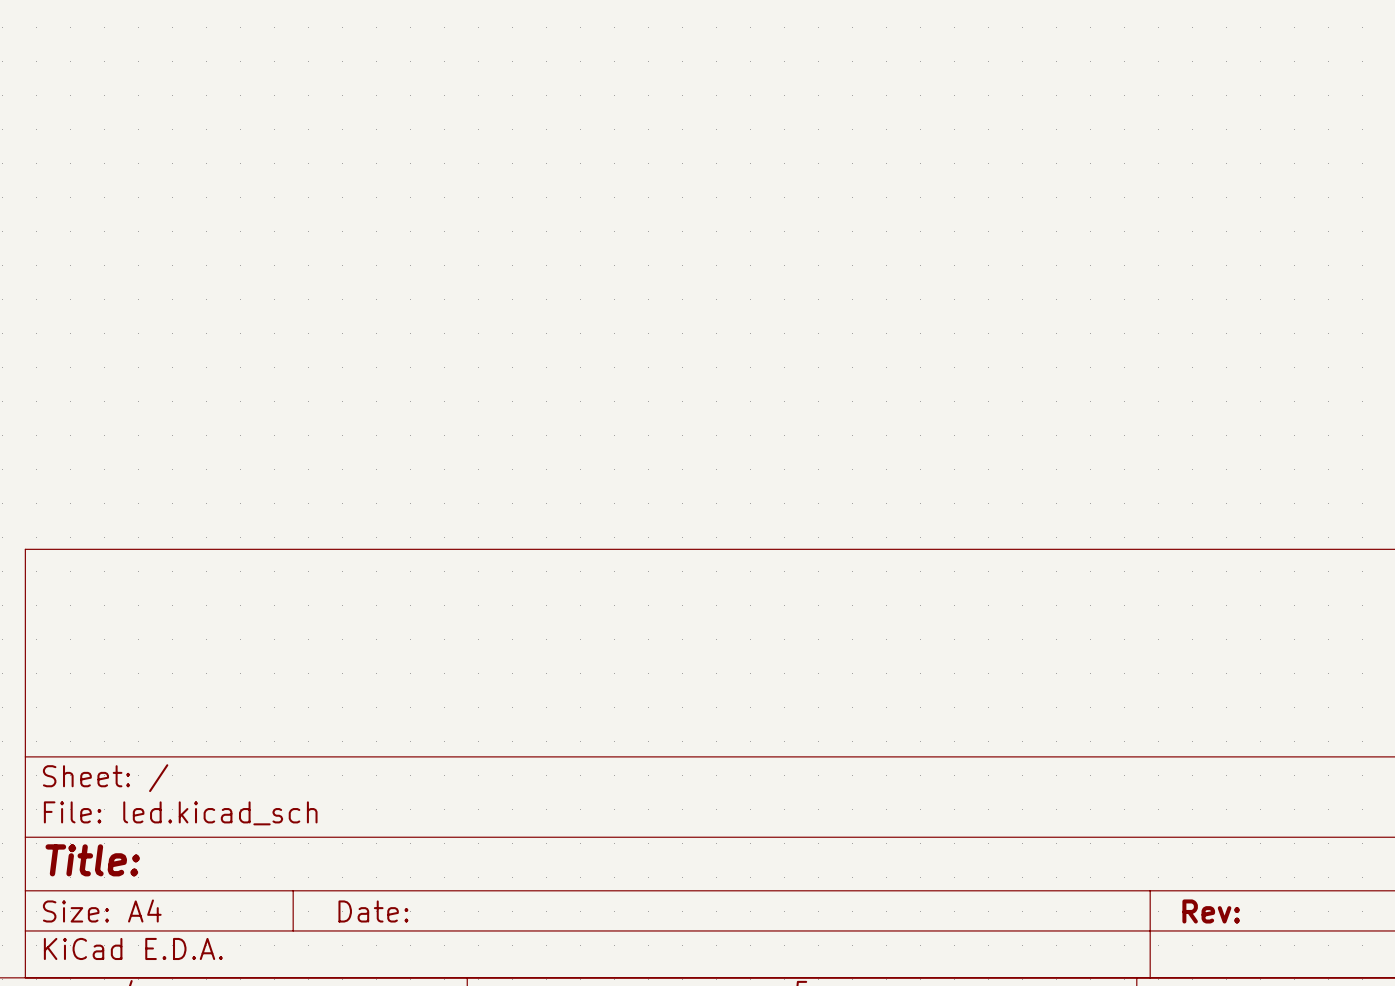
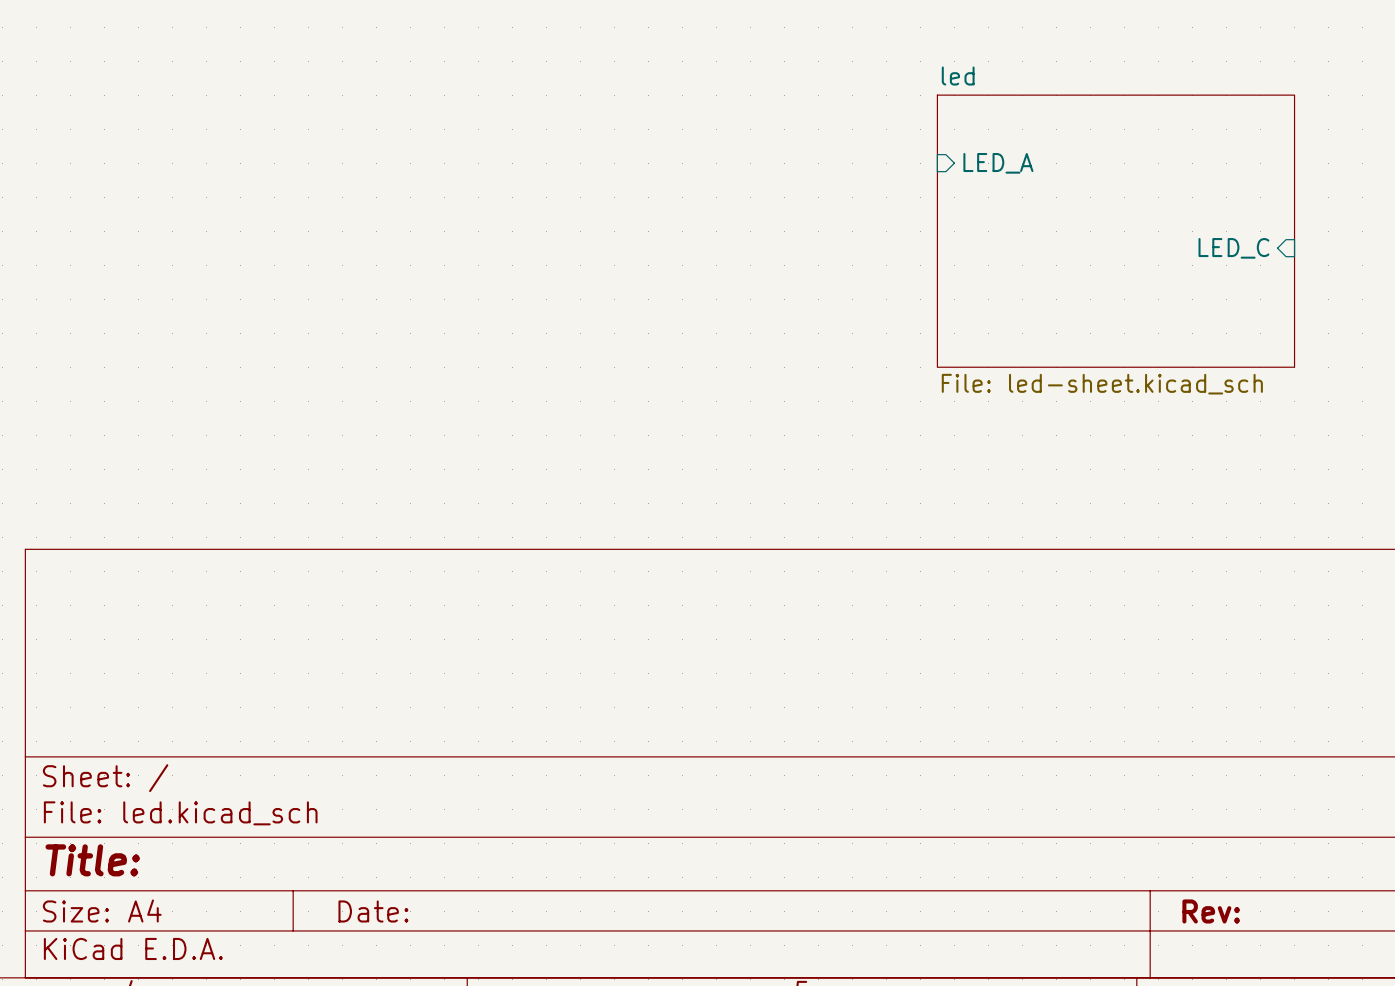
sheet pin: none -> LED_A (998, 163)
sheet led: none -> File: led-sheet.kicad_sch (1115, 231)
sheet pin: none -> LED_C (1233, 248)

